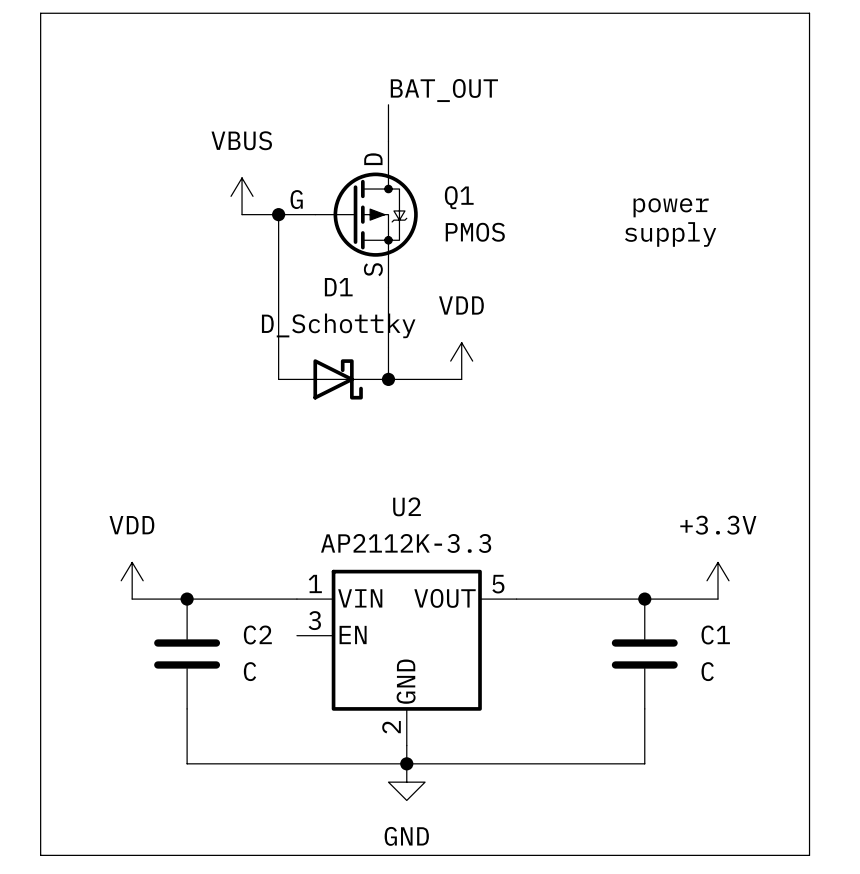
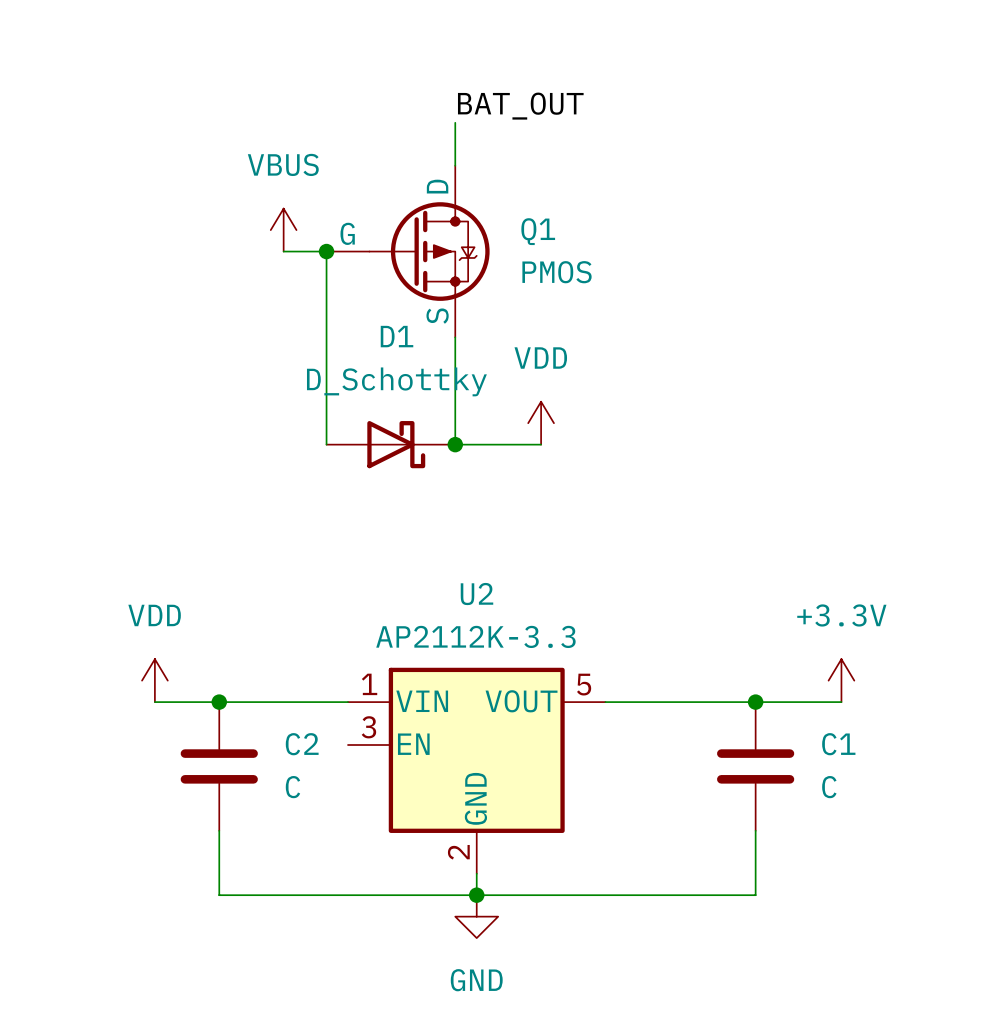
line: (40, 13) (809, 13) (809, 855) (40, 855) (40, 13) -> none
text: power (671, 207) -> none
text: supply (670, 234) -> none

